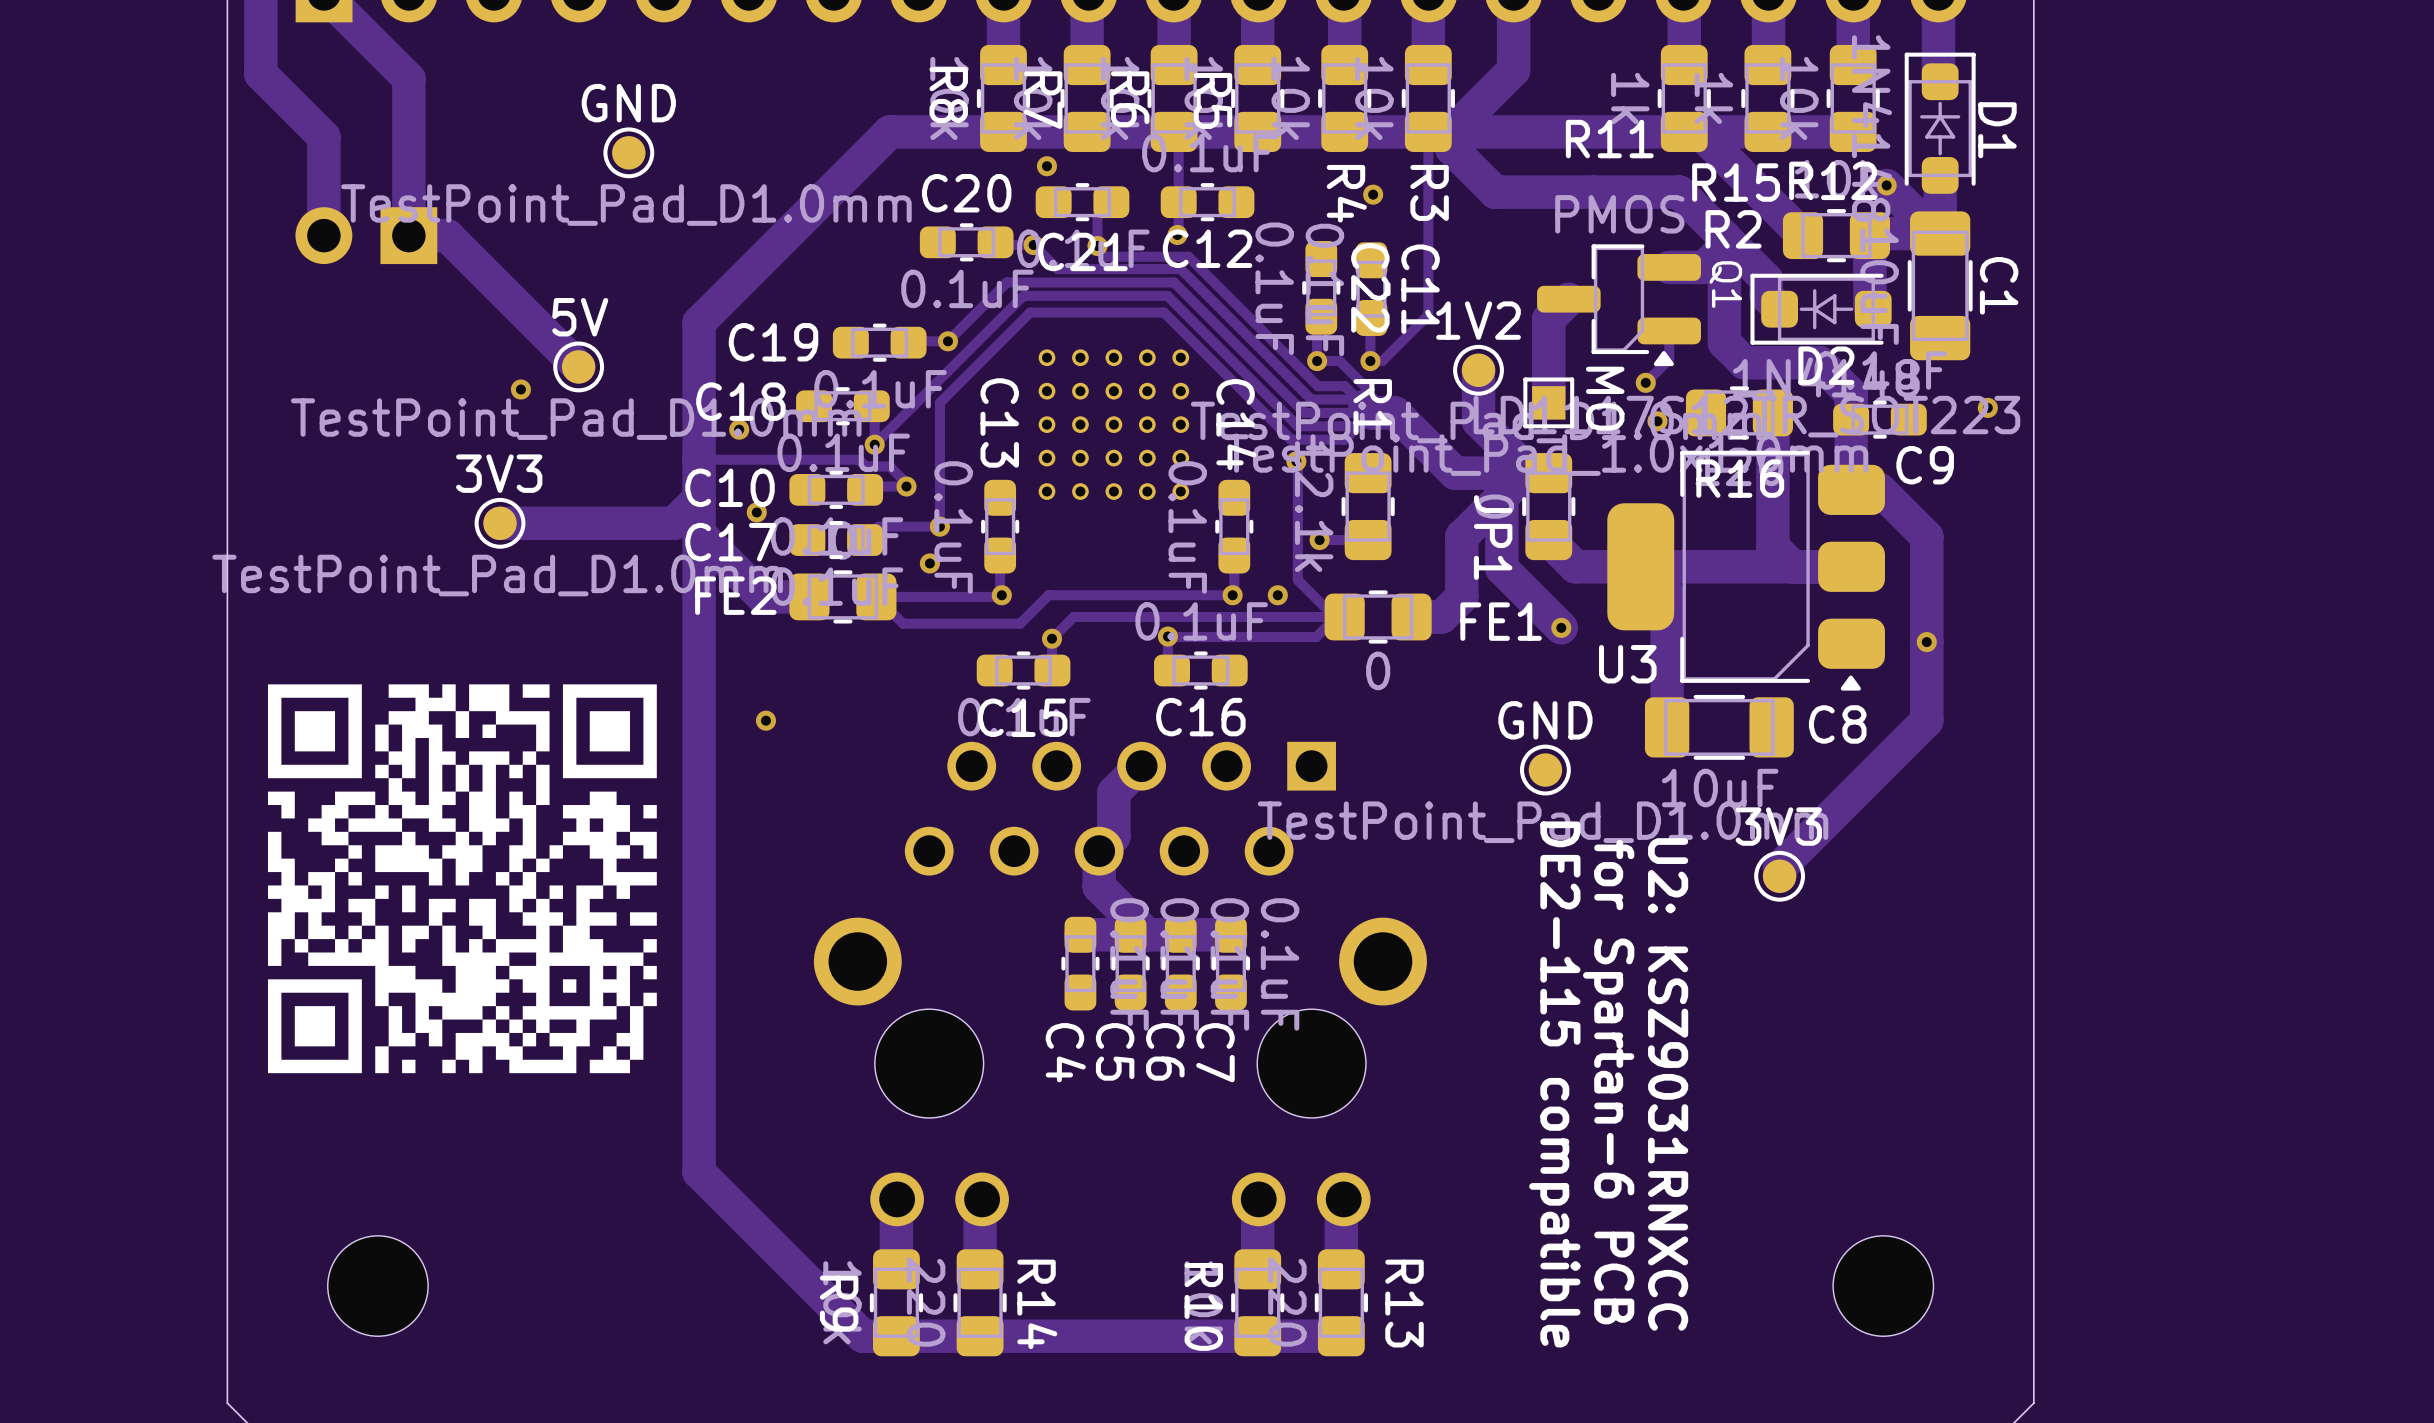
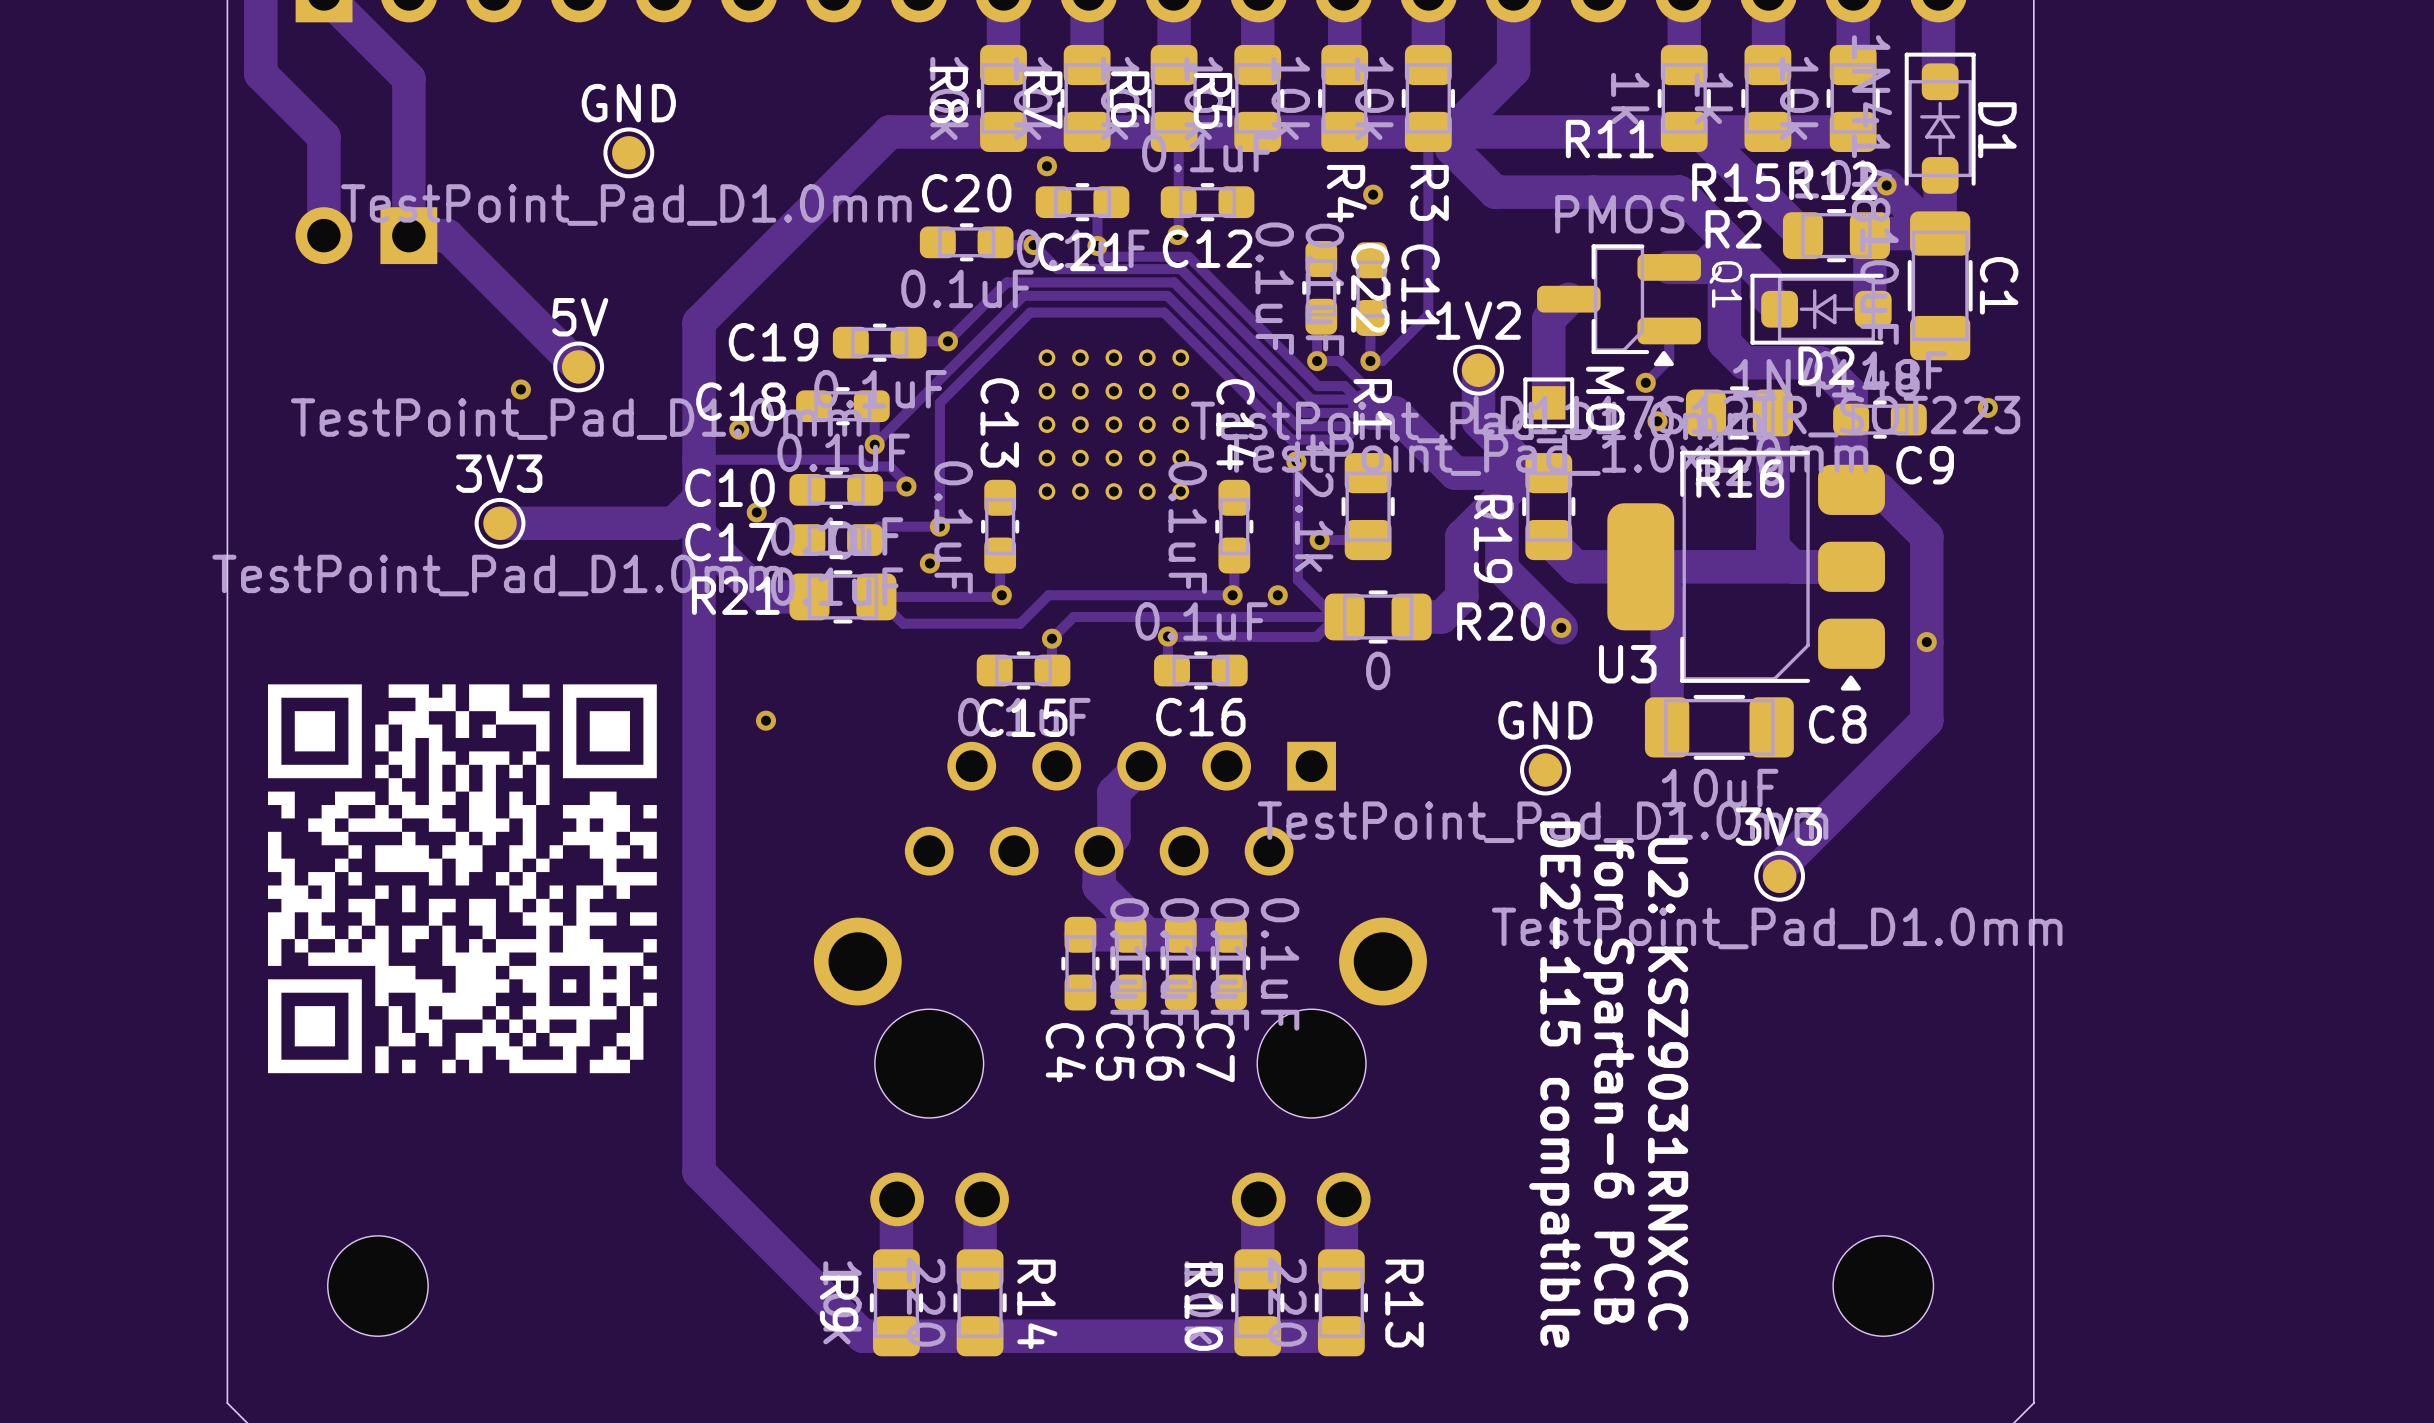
JP1 name: JP1 (1493, 537) -> R19 (1493, 539)
FE2 name: FE2 (735, 595) -> R21 (735, 595)
FE1 name: FE1 (1501, 621) -> R20 (1501, 621)
3V3 value: none -> TestPoint_Pad_D1.0mm (1777, 928)

